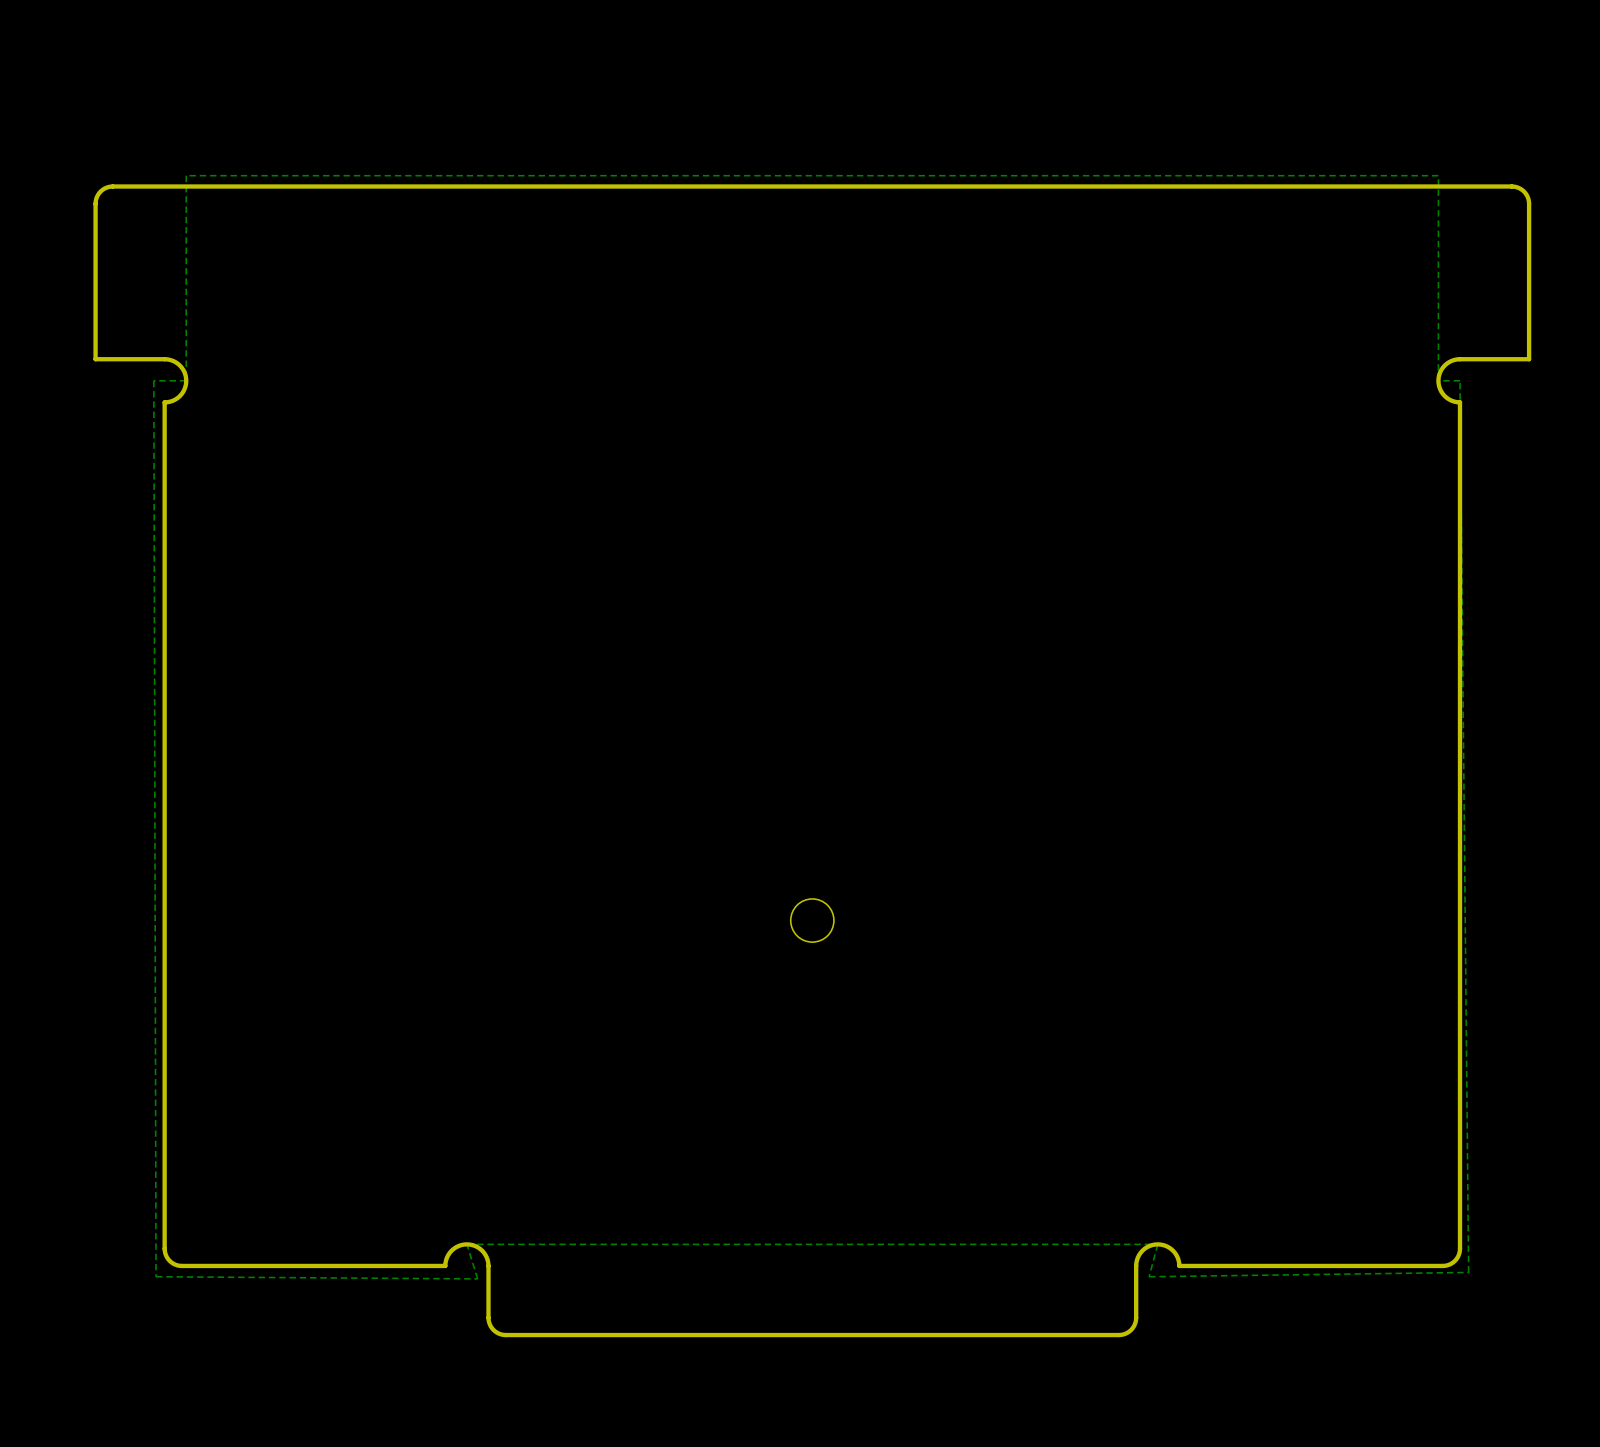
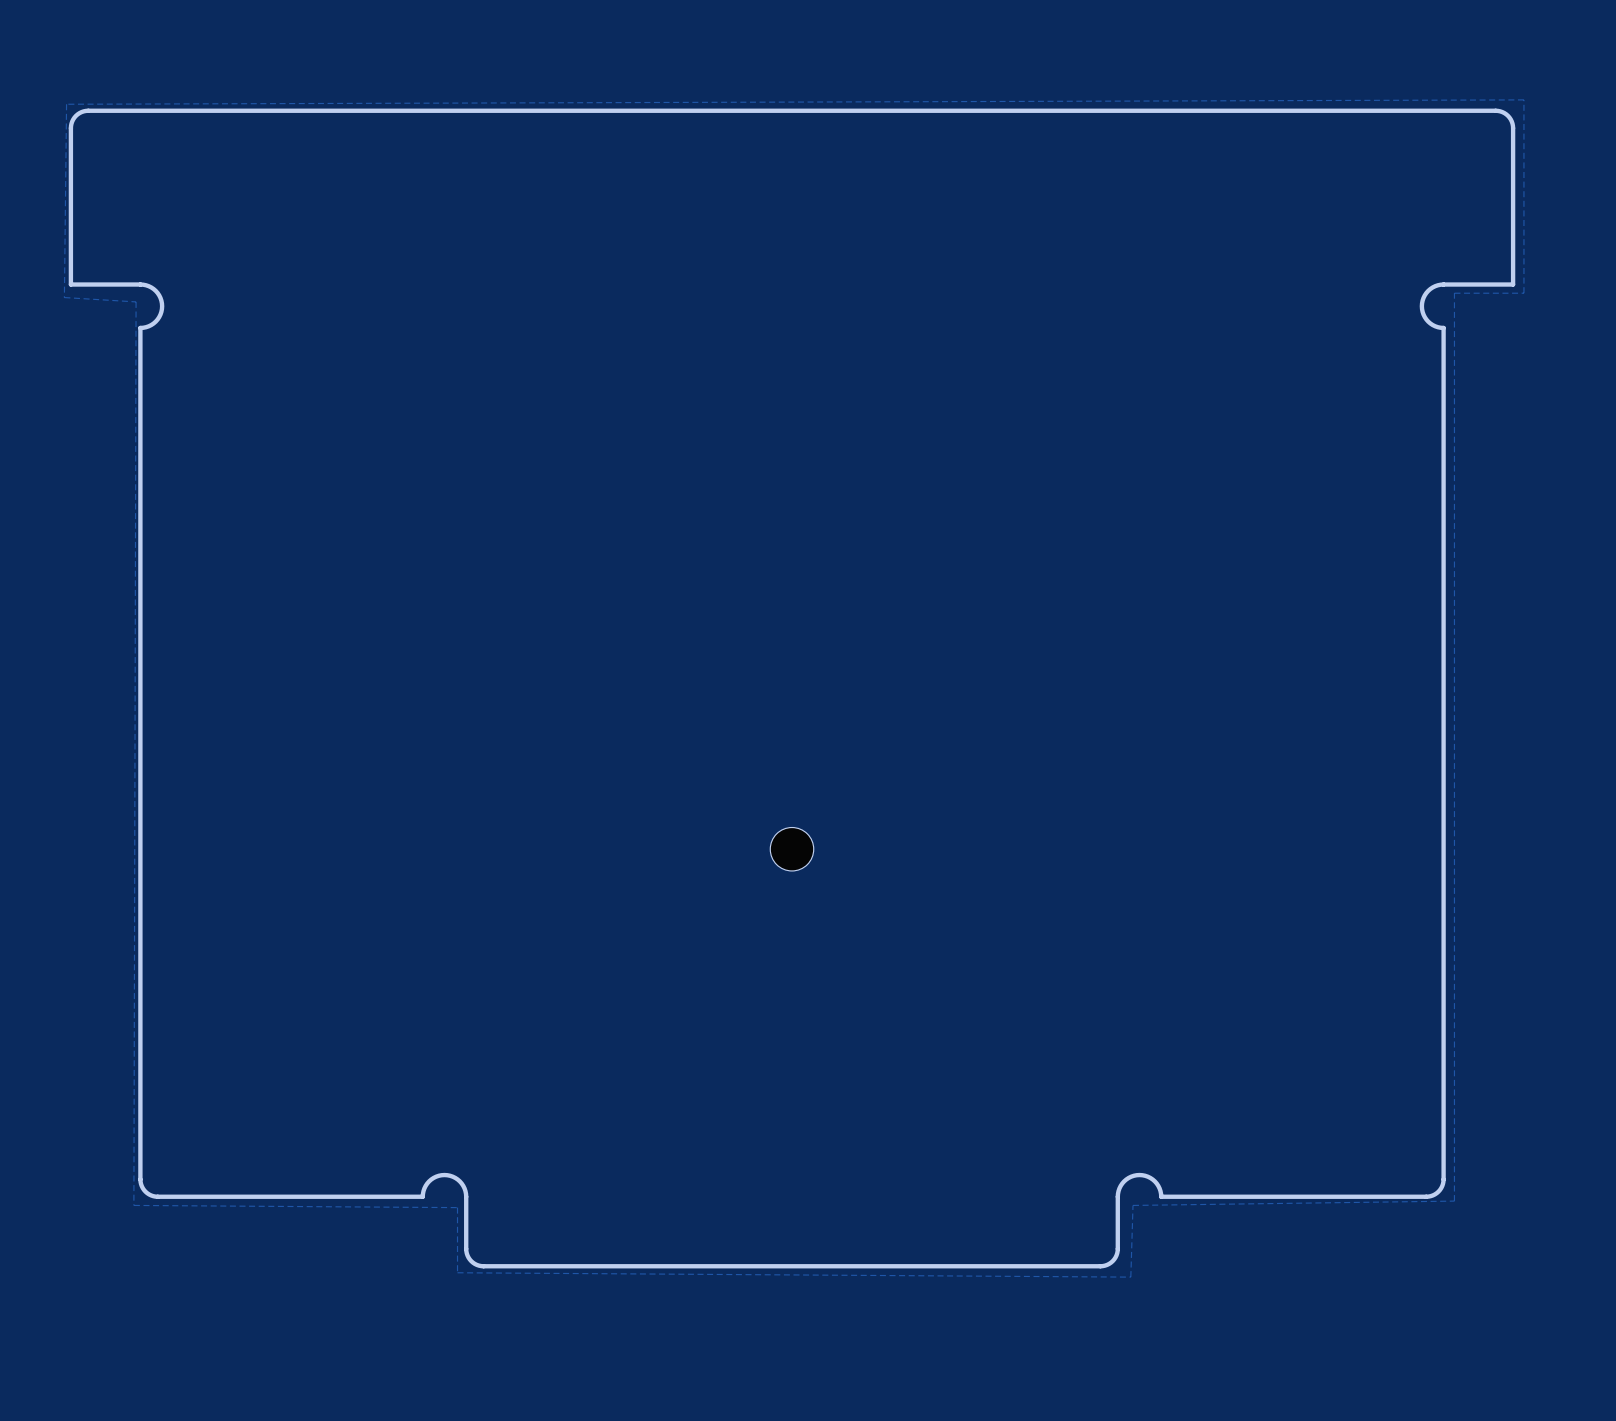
zone outline: (1438, 175) (186, 175) (186, 380) (153, 380) (156, 1276) (477, 1278) (466, 1244) (1157, 1244) (1149, 1276) (1468, 1272) (1460, 380) (1438, 380) (1438, 175) -> (1523, 99) (1523, 293) (1454, 293) (1454, 1201) (1133, 1205) (1130, 1277) (457, 1272) (457, 1207) (133, 1205) (136, 301) (64, 297) (66, 104) (1523, 99)

